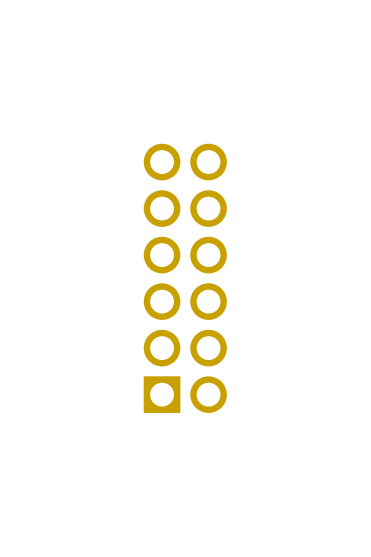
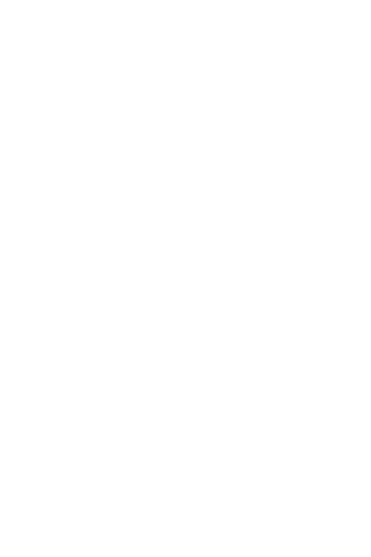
part: (185, 278) -> none

